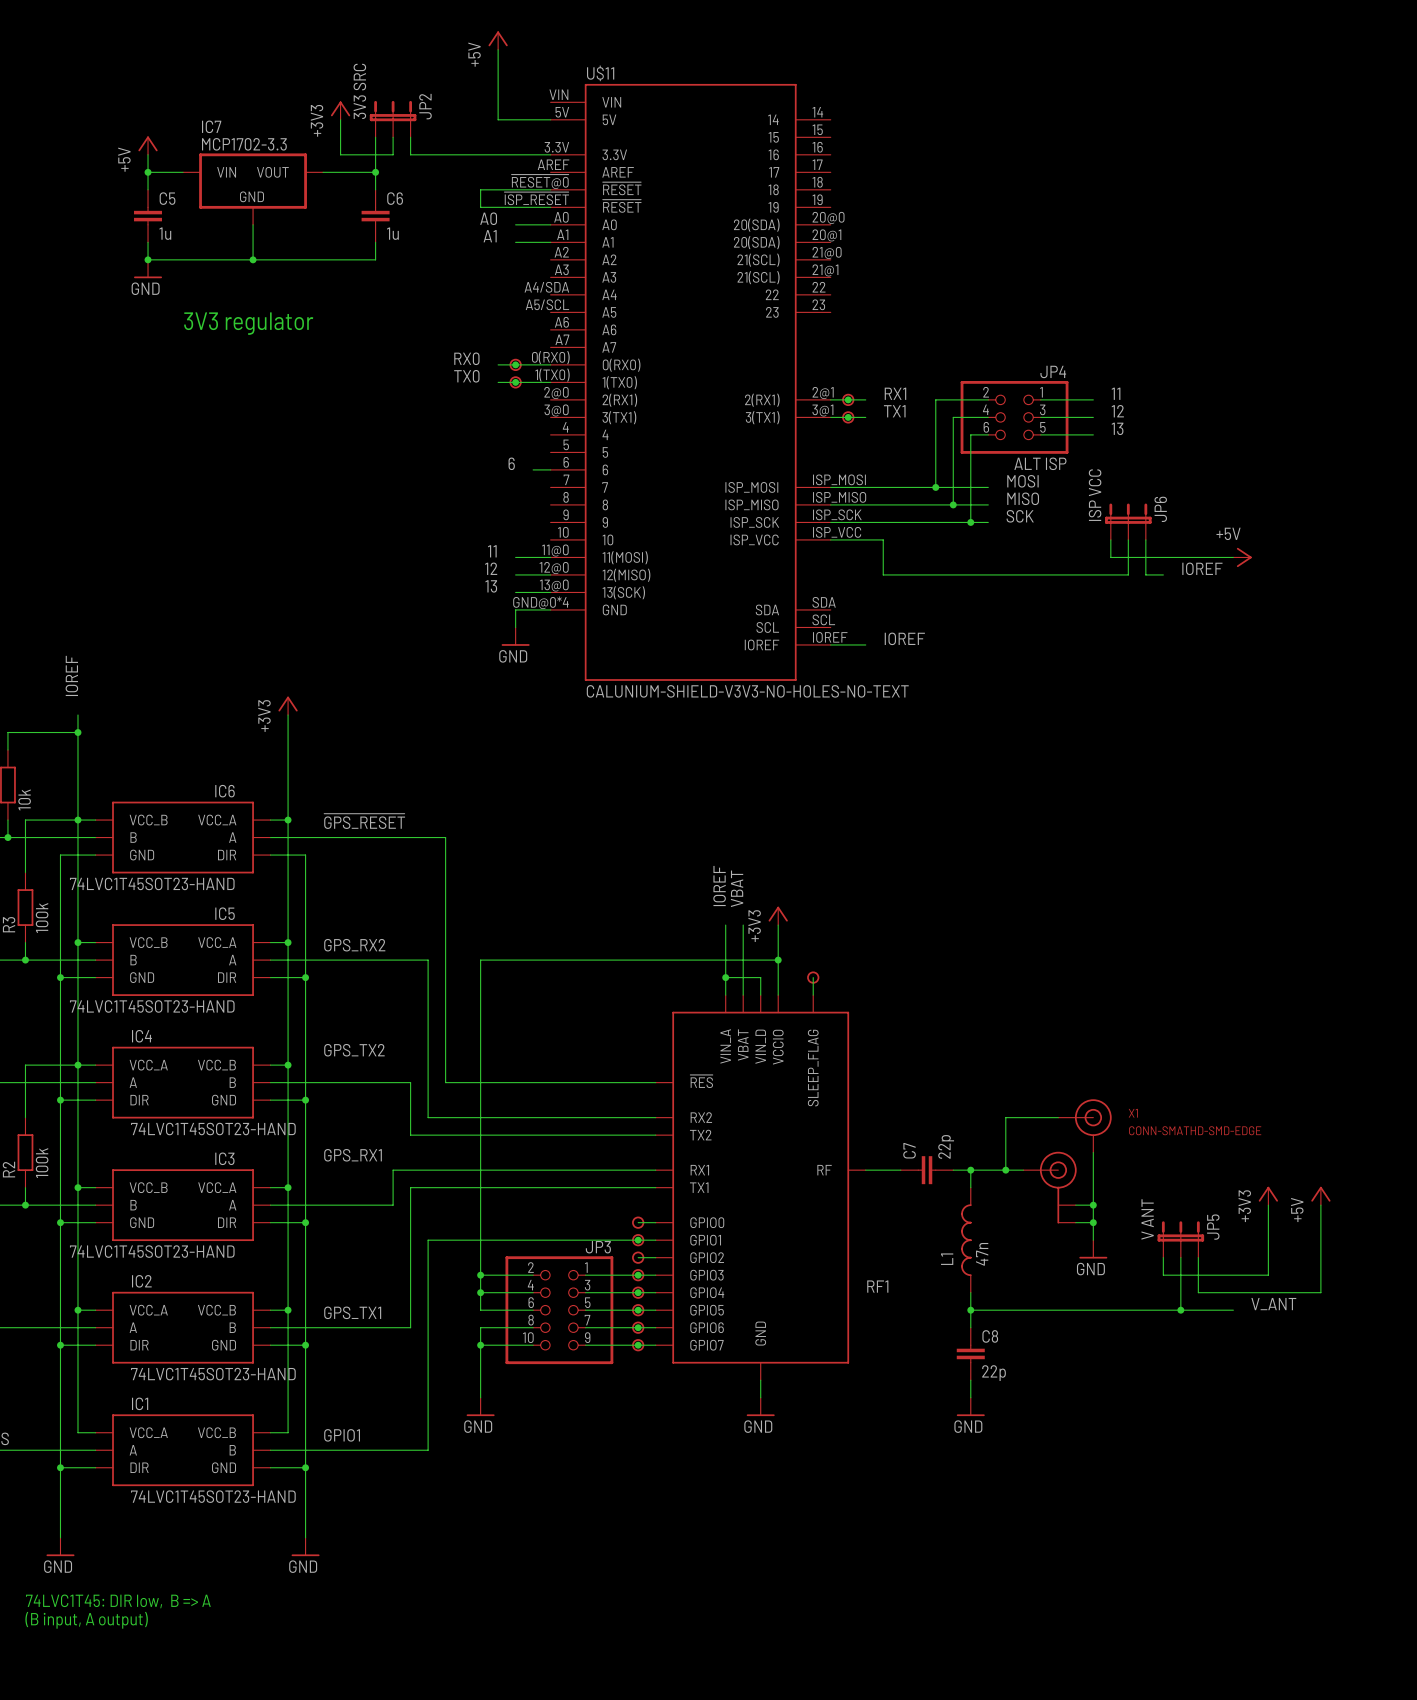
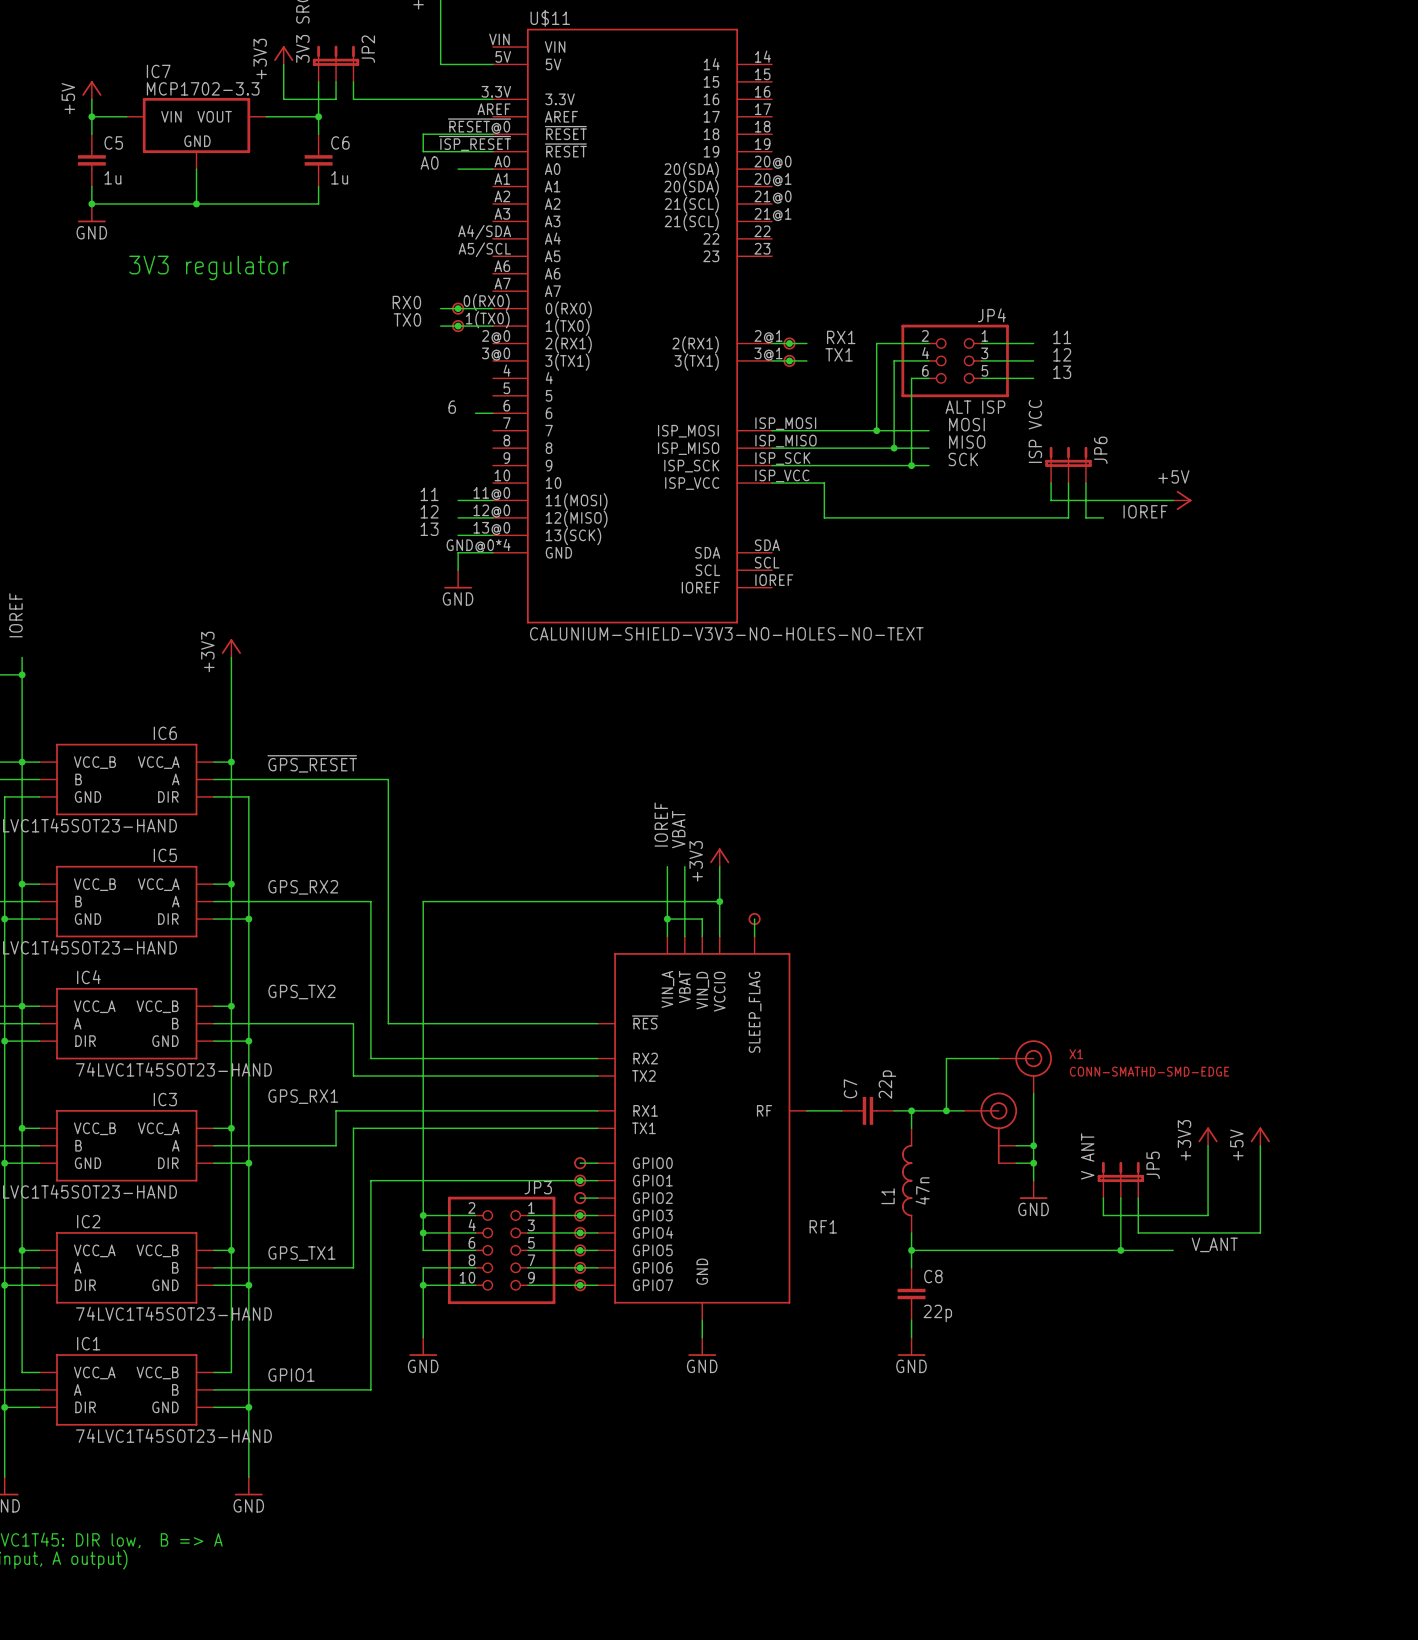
label: A1 (490, 236) -> none
wire: (515, 242) (550, 242) -> none
label: IOREF (904, 638) -> none
wire: (830, 644) (865, 644) -> none

